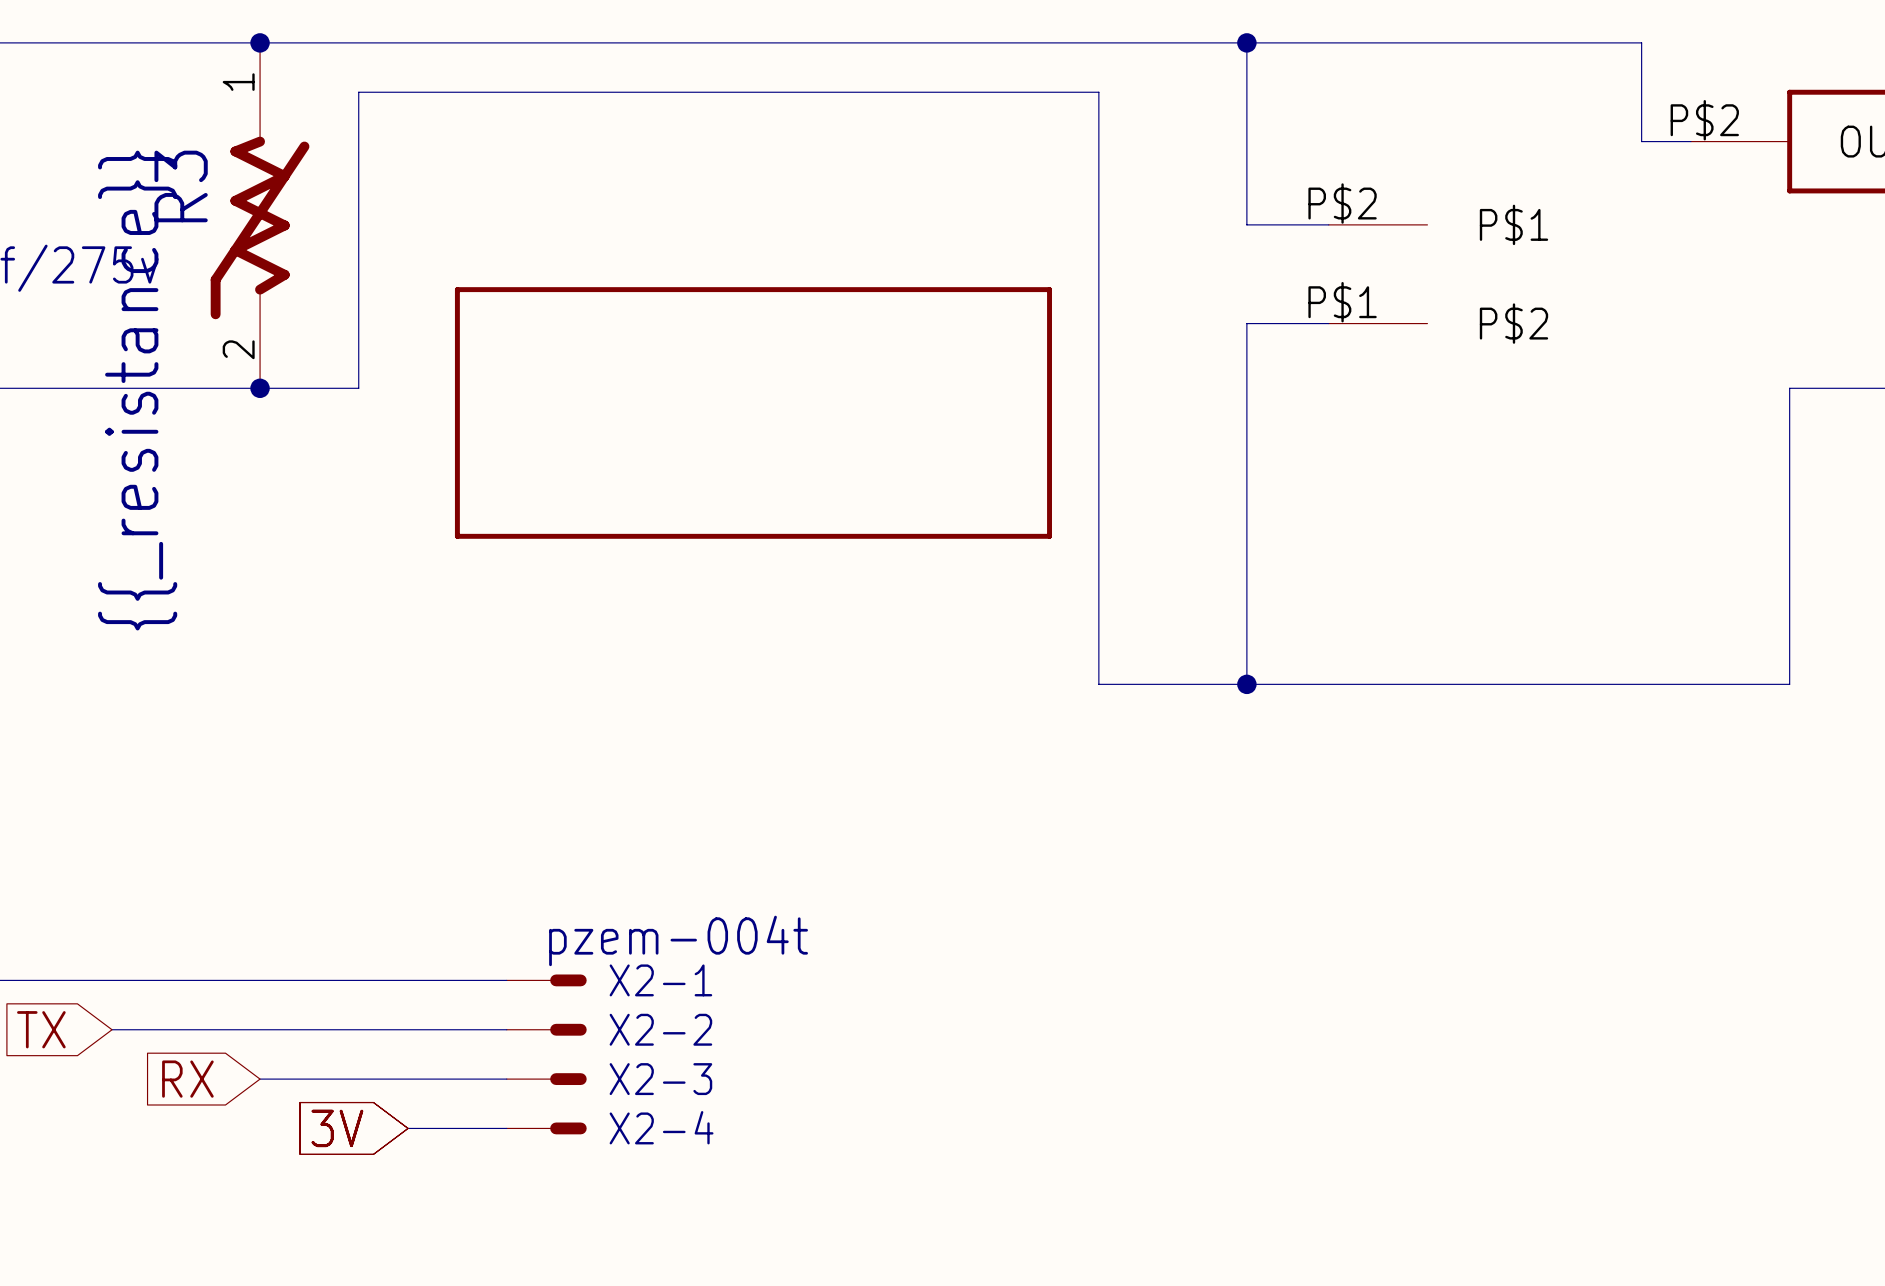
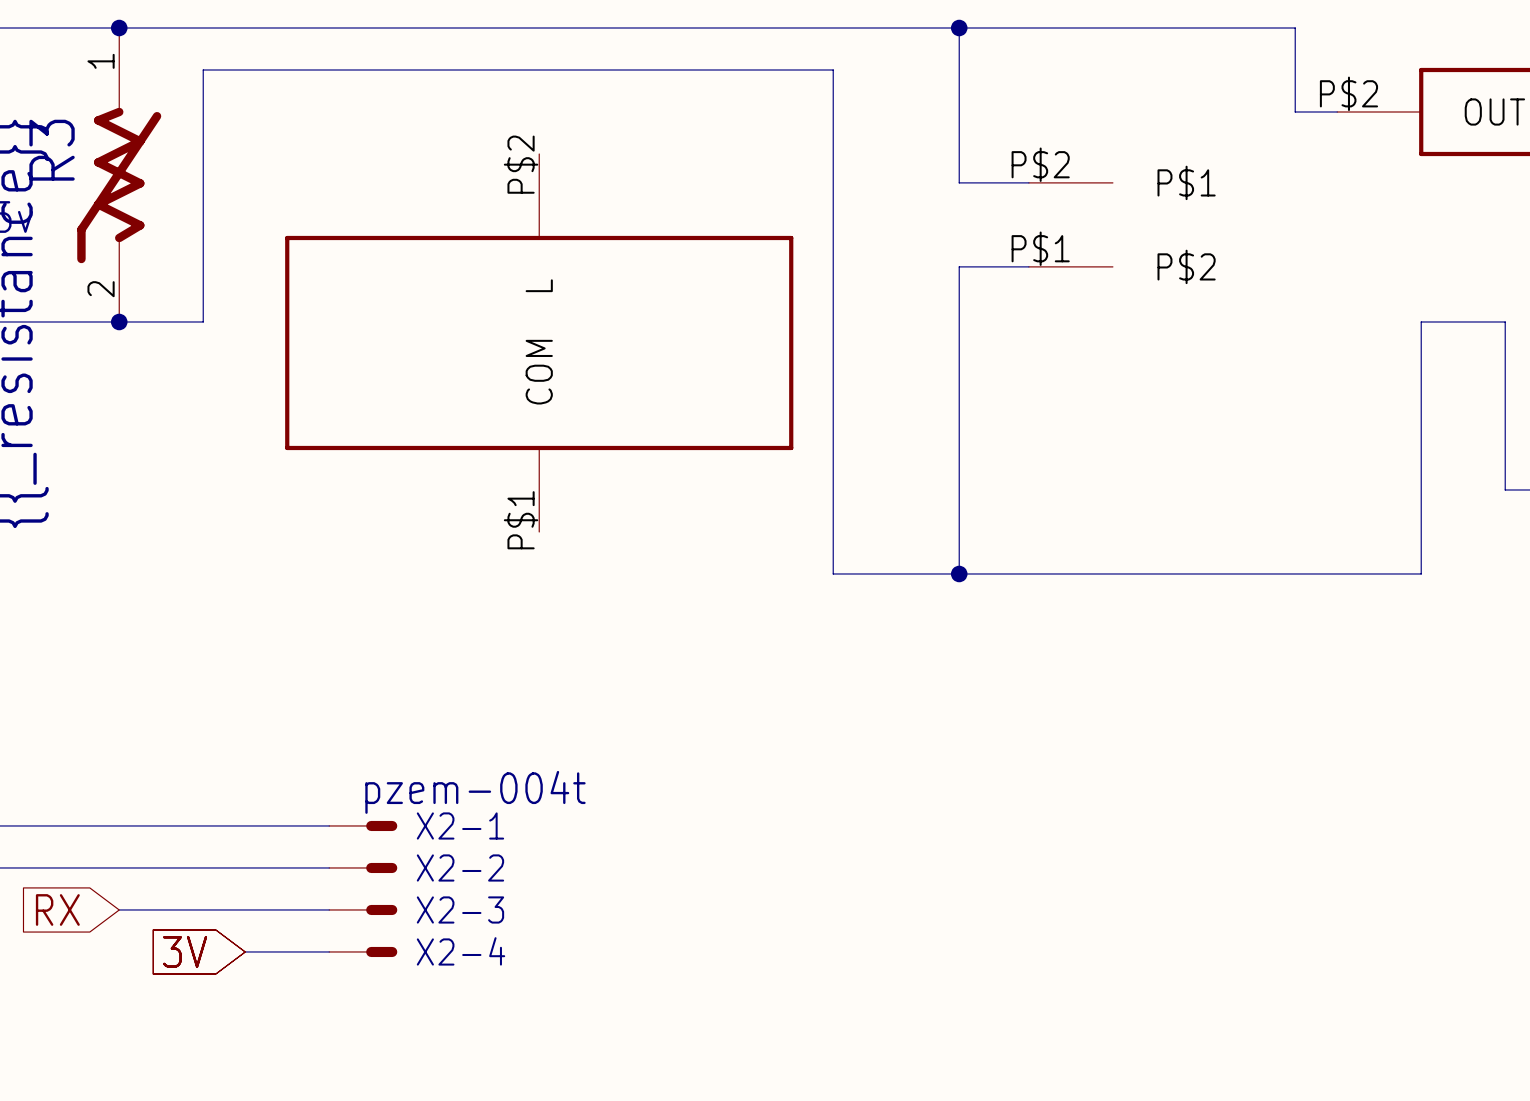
part symbol: [454, 287, 1052, 539] -> [285, 153, 794, 532]

